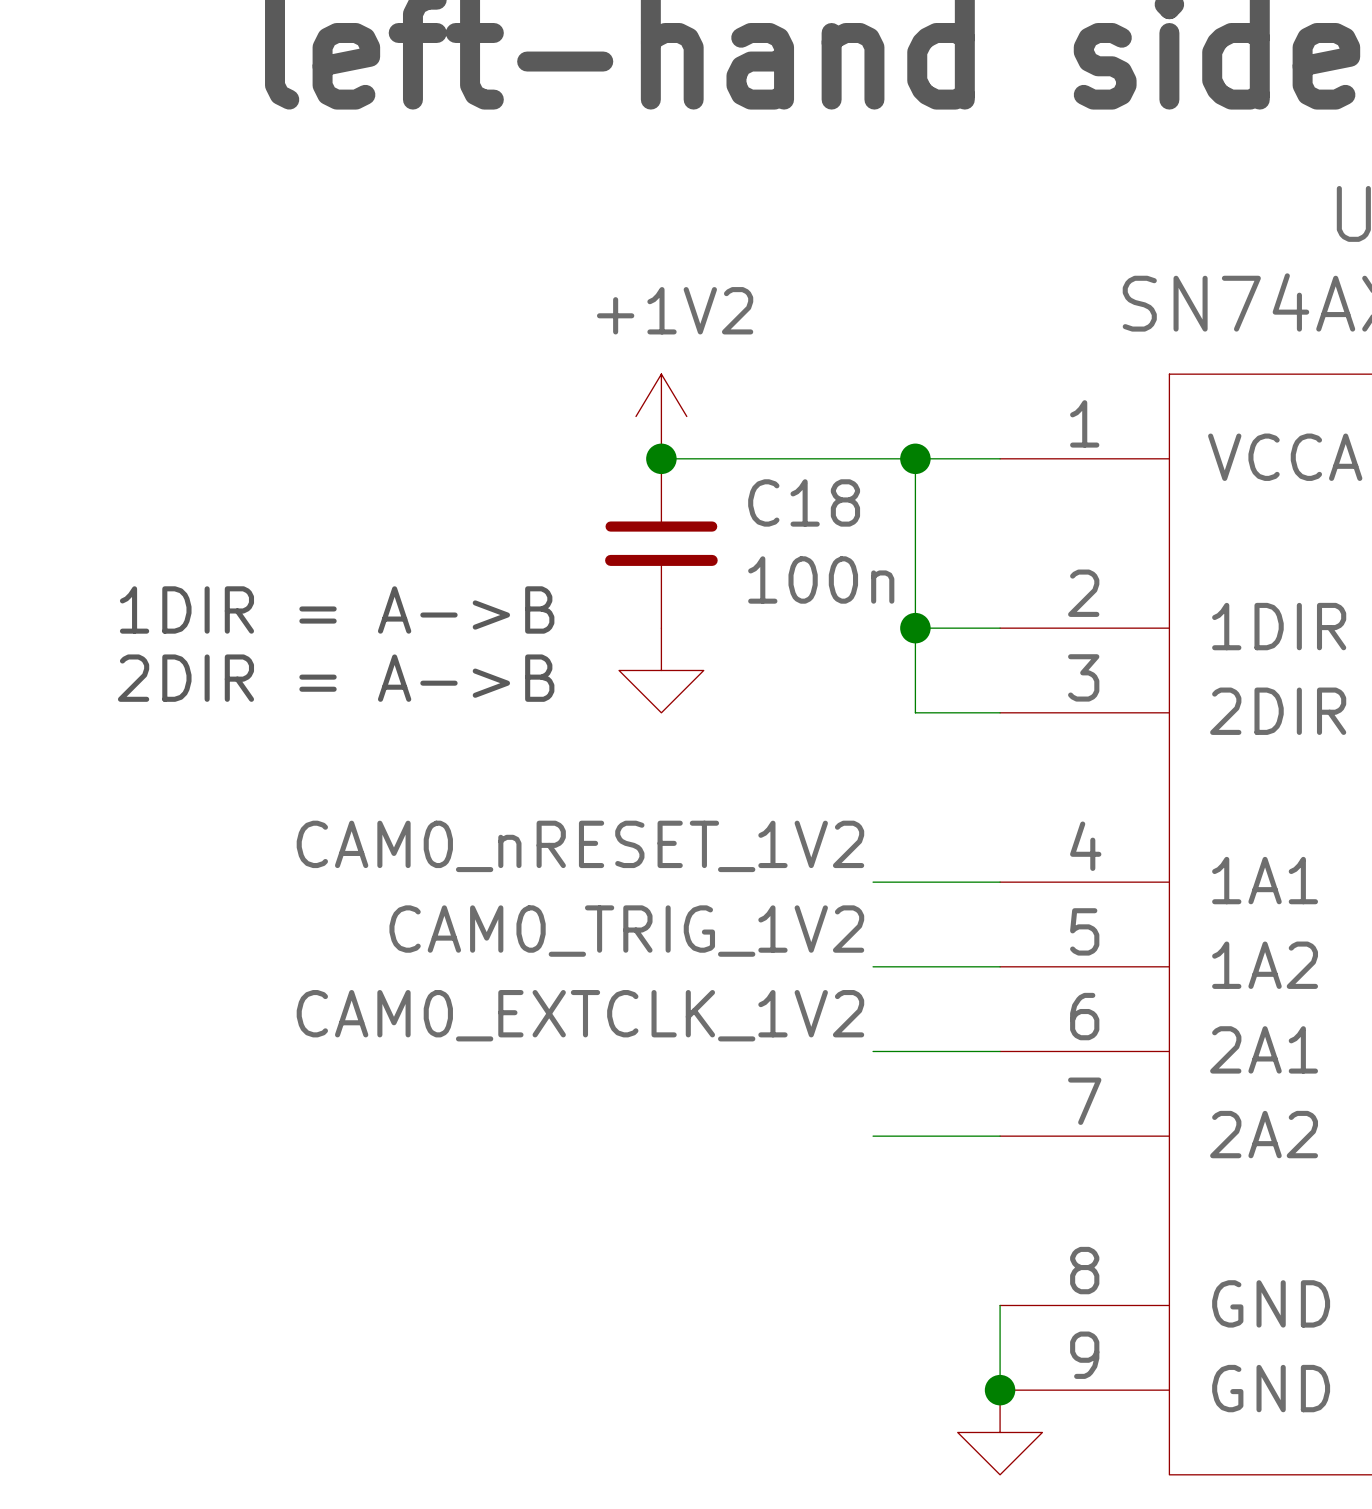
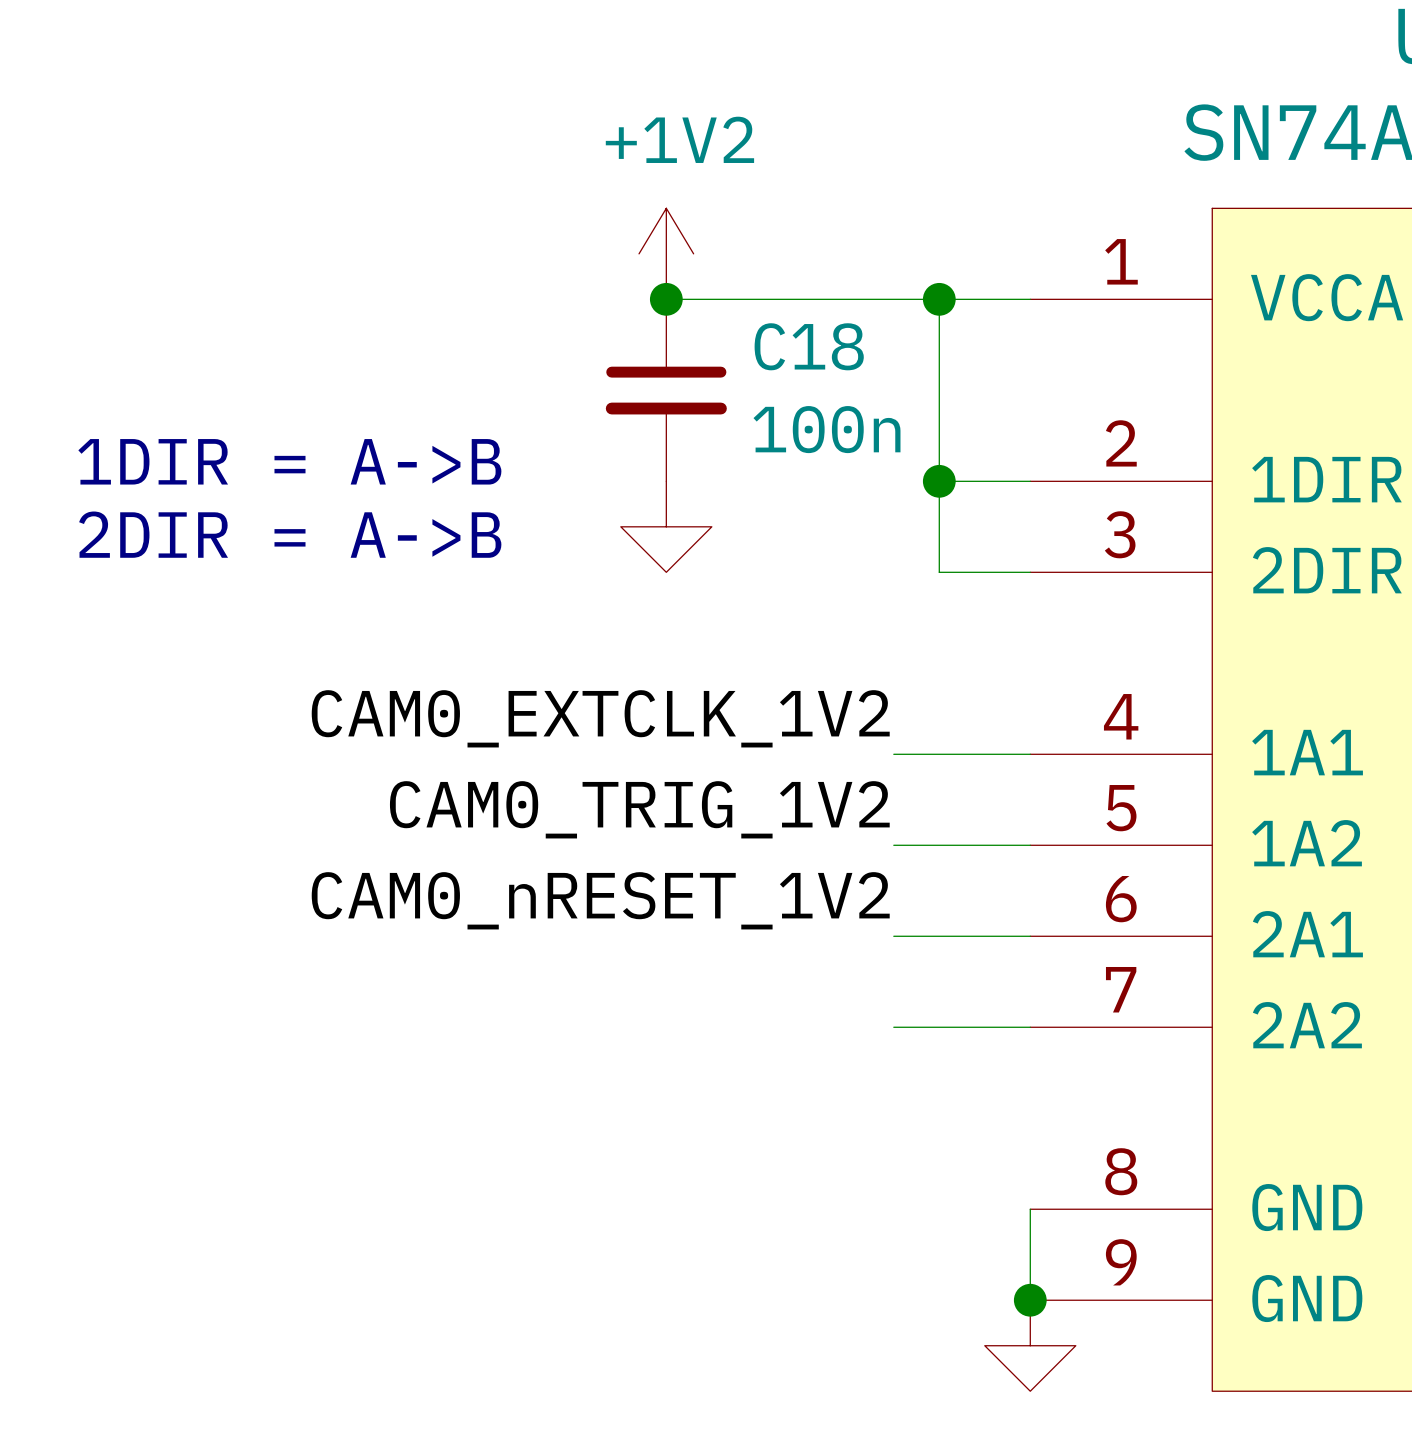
label: CAM0_nRESET_1V2 (580, 846) -> CAM0_EXTCLK_1V2 (600, 718)
label: CAM0_EXTCLK_1V2 (580, 1015) -> CAM0_nRESET_1V2 (600, 900)

